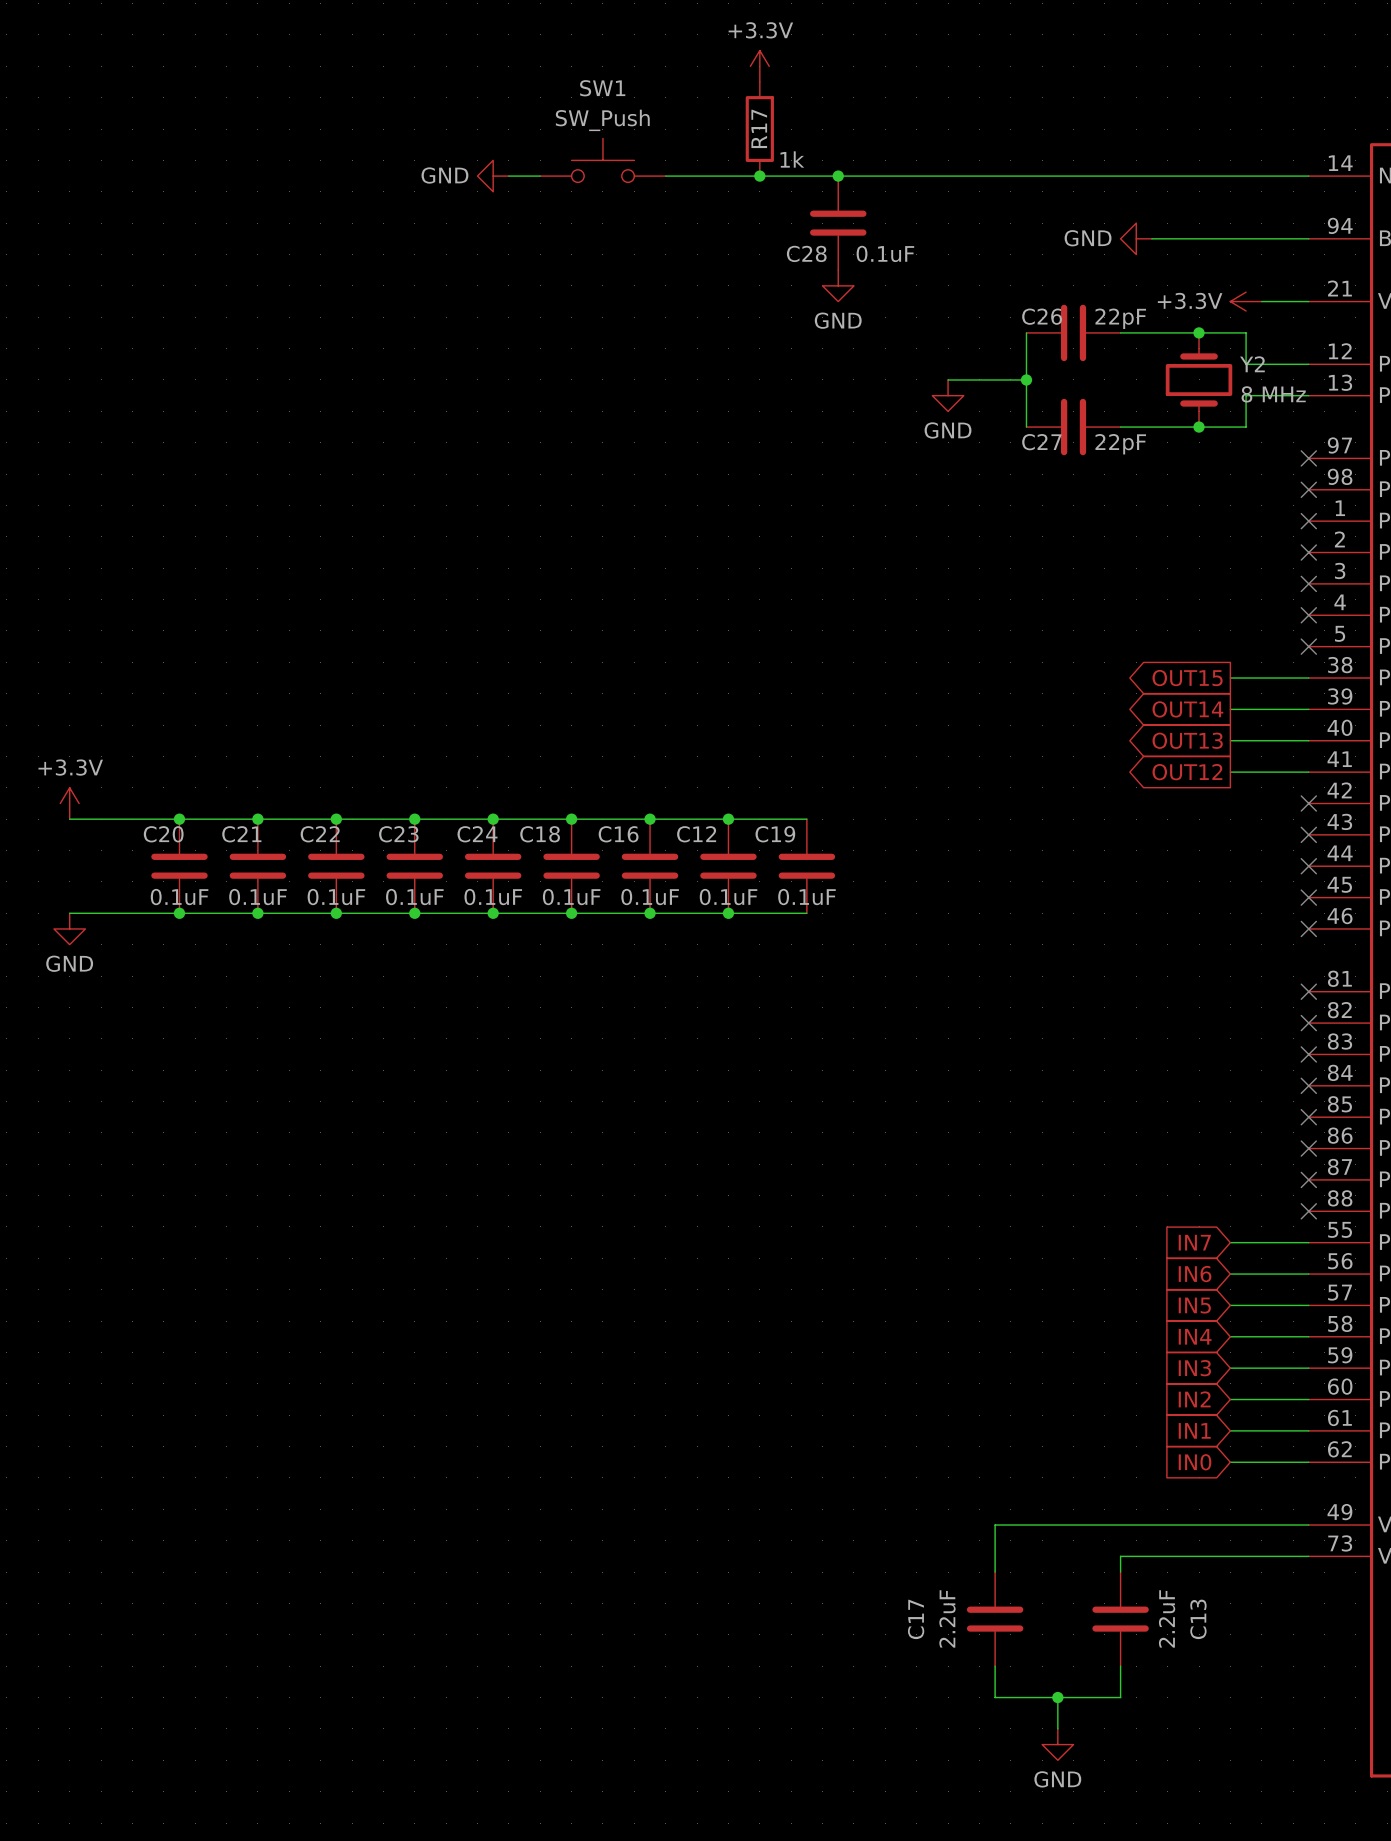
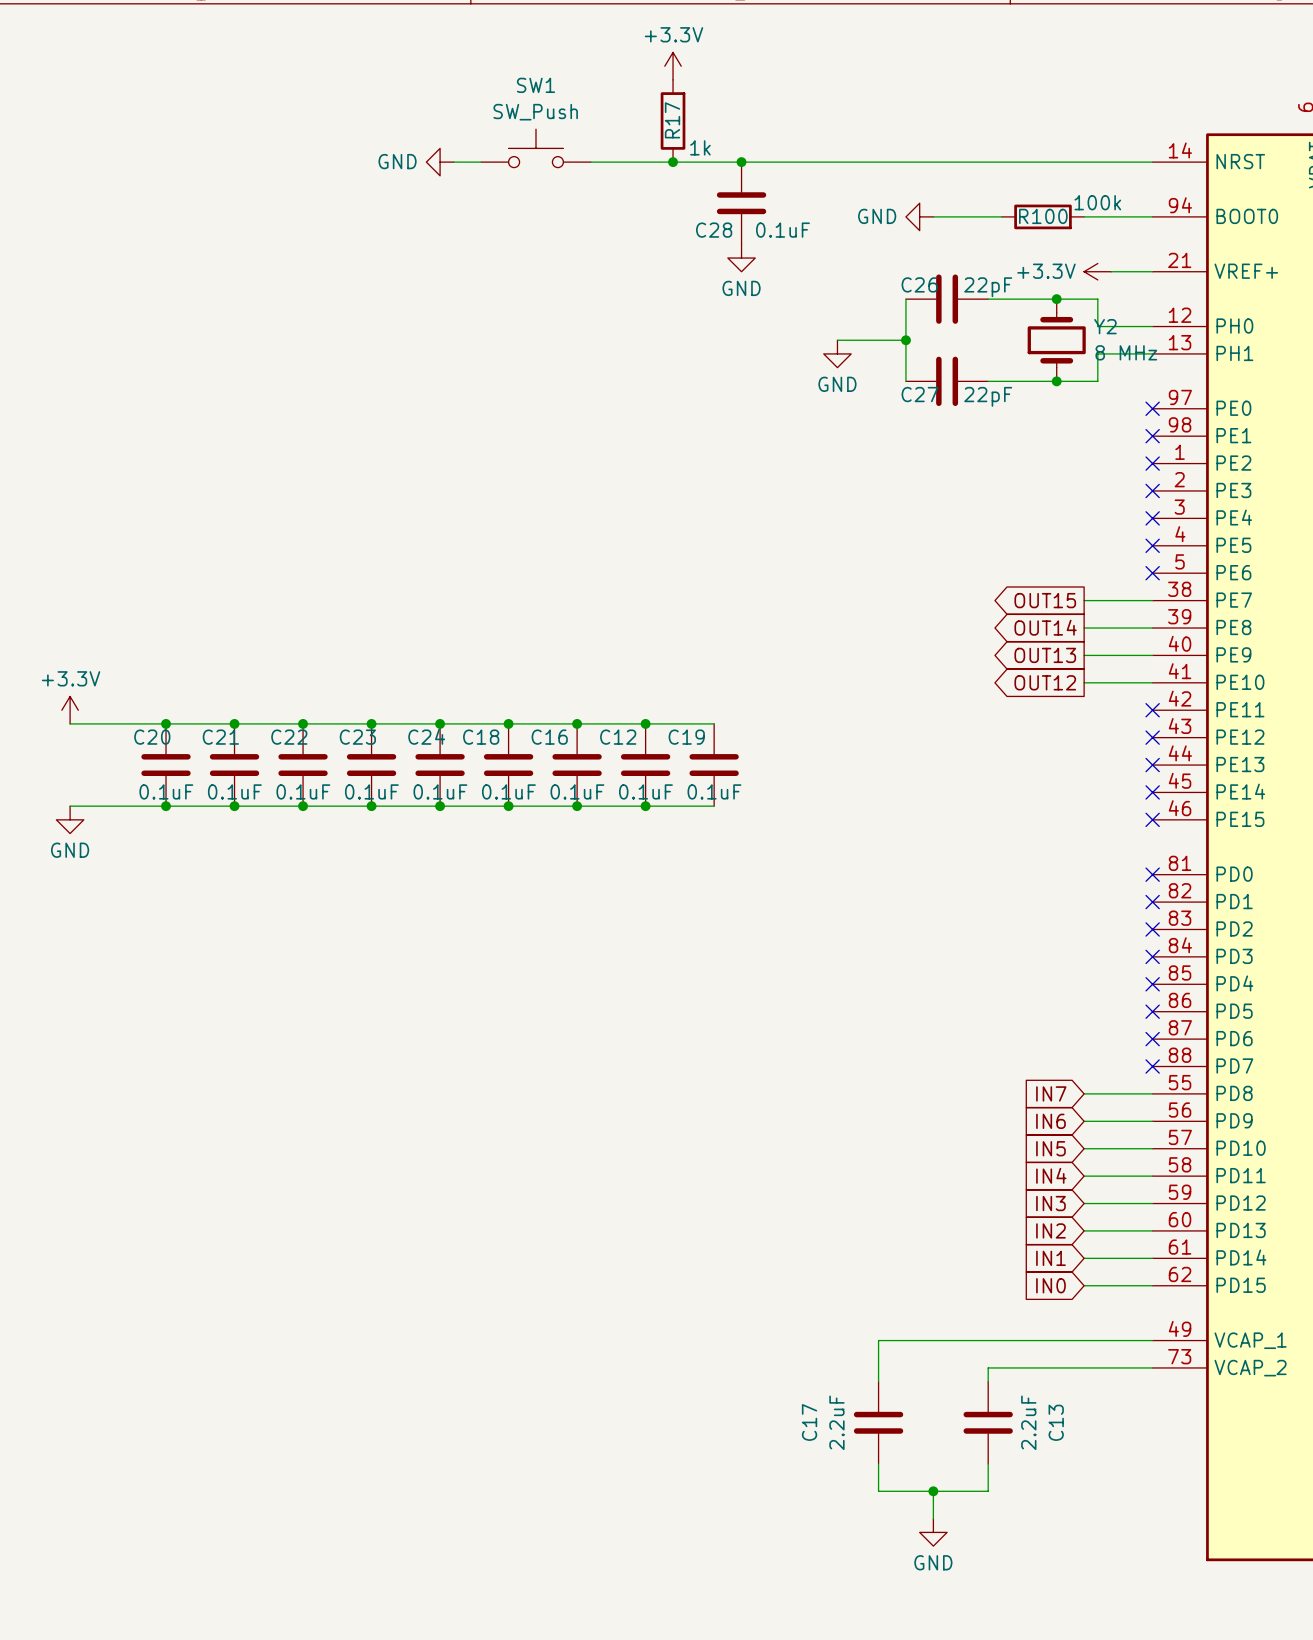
power symbol position: GND (1136, 238) -> GND (919, 216)
wire: (1151, 238) (1230, 238) -> (933, 216) (1001, 216)
R100: none -> 100k (1043, 216)

